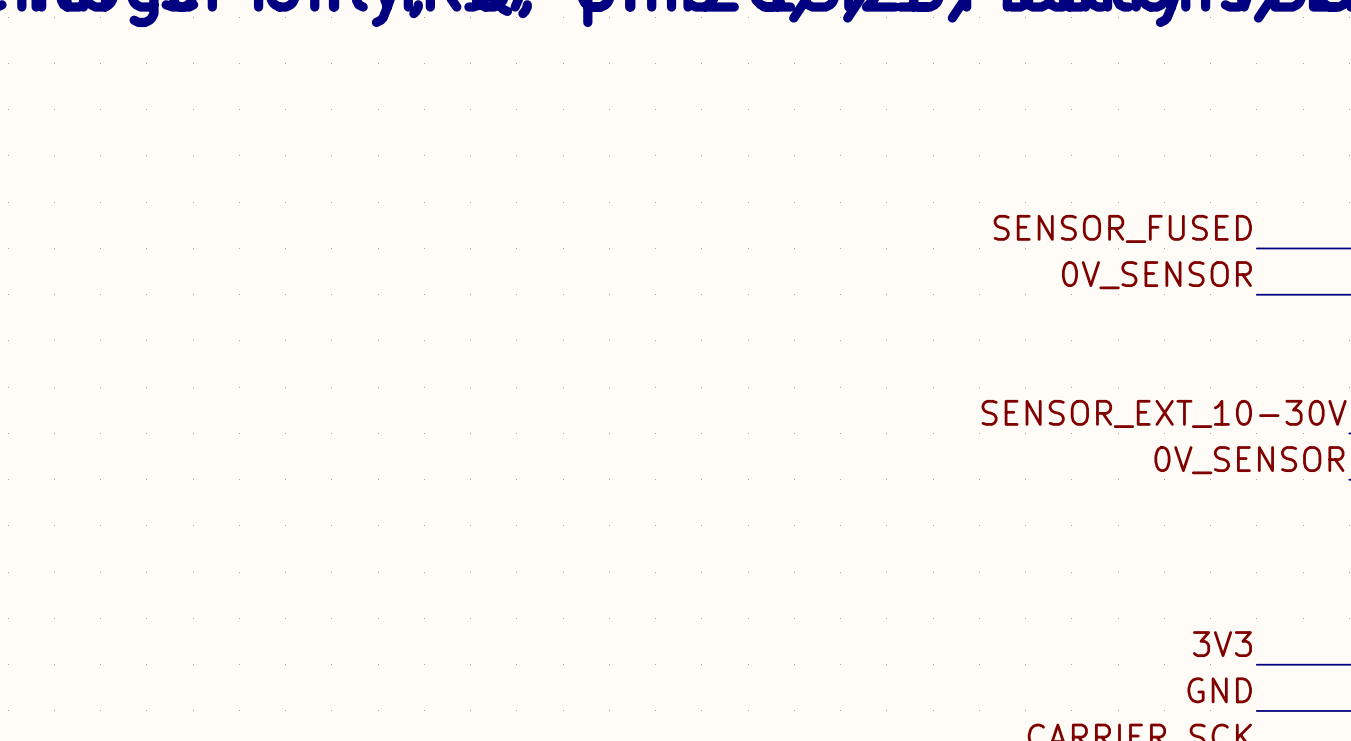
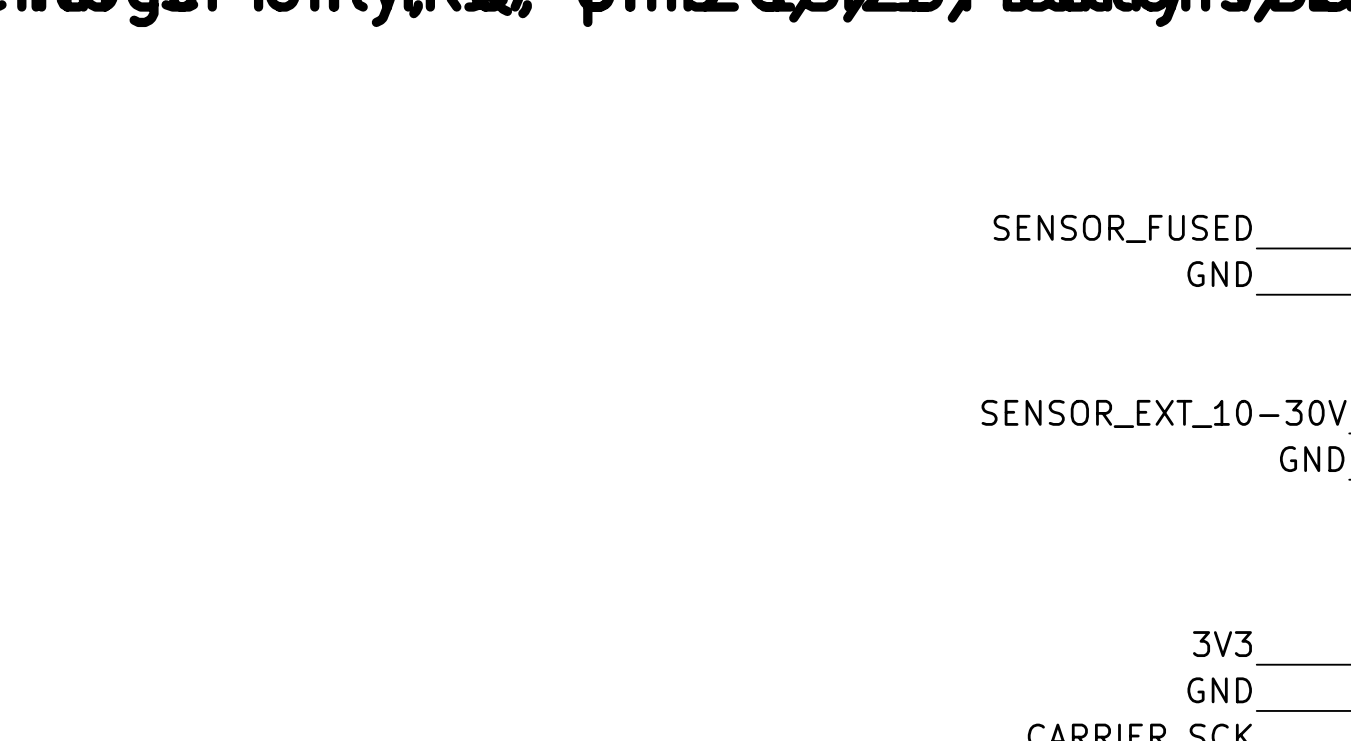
label: 0V_SENSOR (1156, 275) -> GND (1219, 274)
label: 0V_SENSOR (1249, 460) -> GND (1312, 459)

